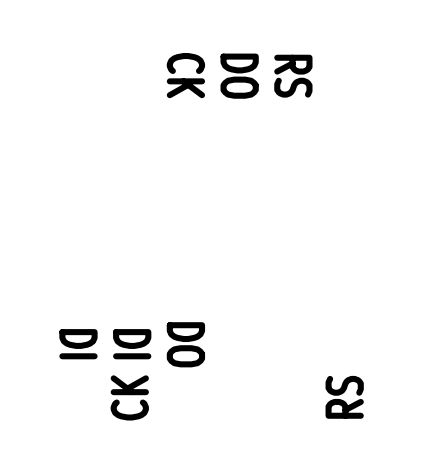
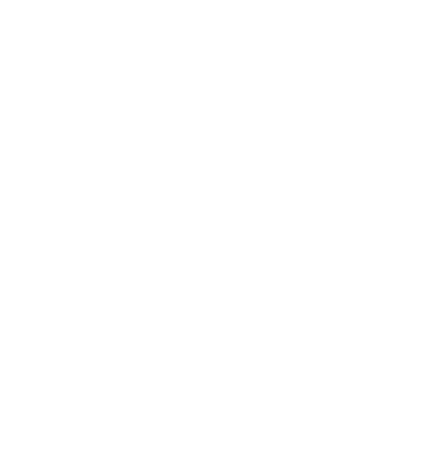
text: CK (185, 75) -> none
text: DO (239, 76) -> none
text: RS (293, 76) -> none
text: DI (78, 344) -> none
text: DI (132, 344) -> none
text: DO (185, 344) -> none
text: CK (129, 397) -> none
text: RS (344, 397) -> none

